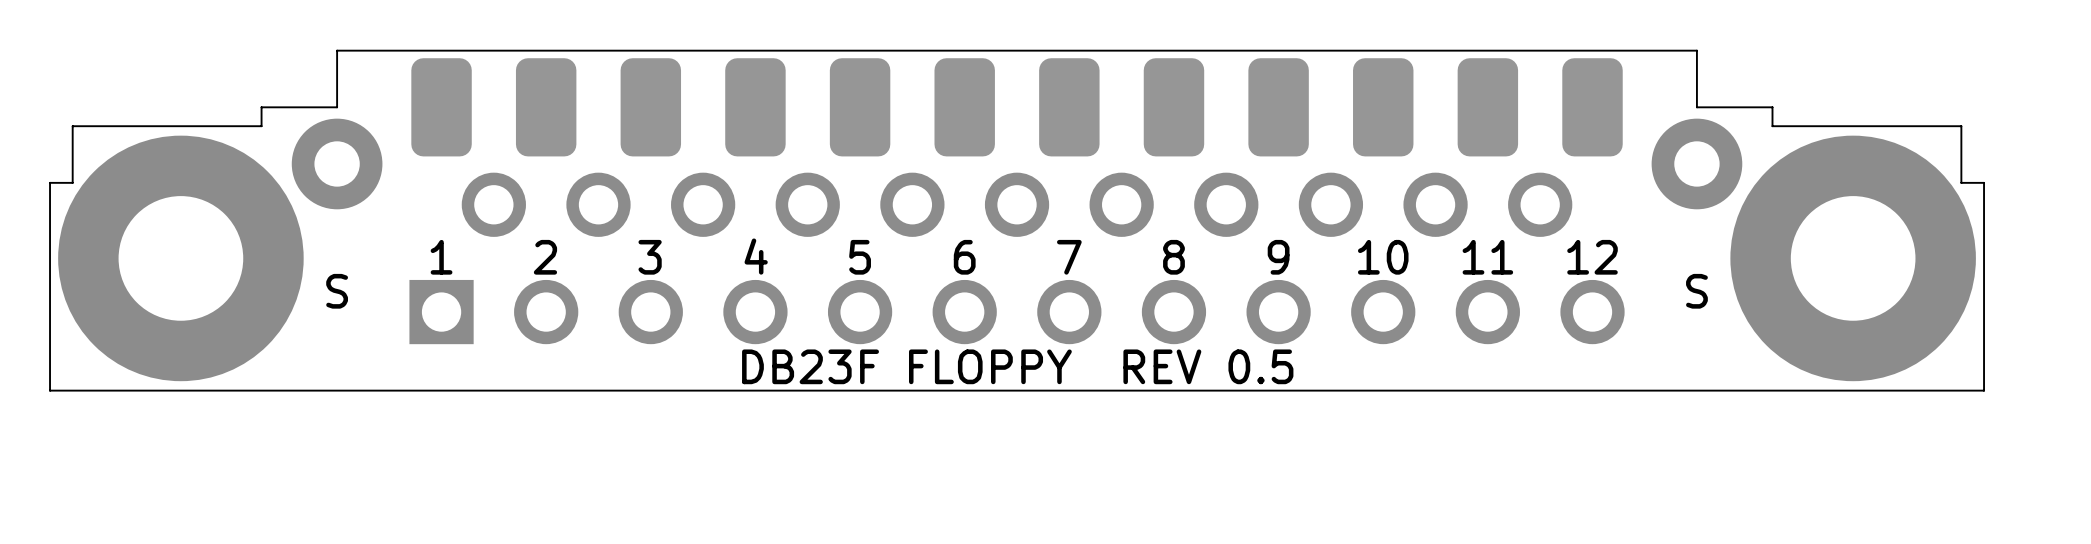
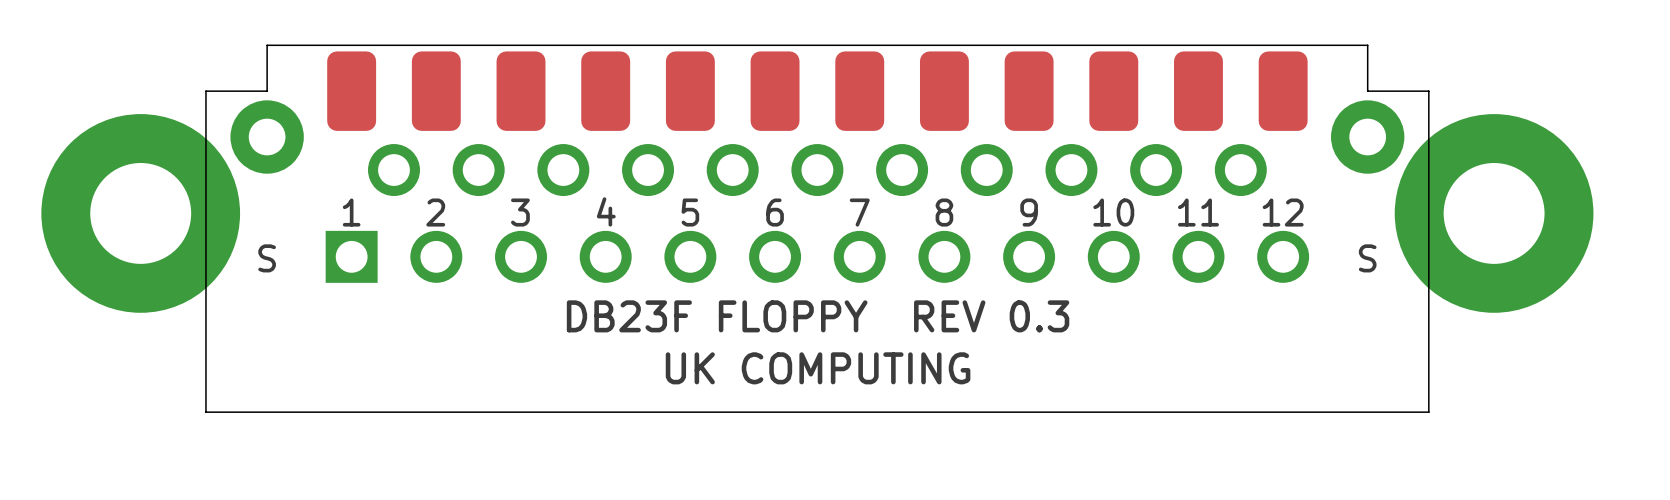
board edge: (261, 126) (72, 126) (72, 182) (50, 182) (50, 390) (1984, 390) (1984, 182) (1961, 182) (1961, 126) (1772, 126) -> (205, 106) (205, 412) (1428, 412) (1428, 106)
text position: S (337, 291) -> S (267, 258)
text position: S (1696, 291) -> S (1367, 258)
text: DB23F FLOPPY REV 0.5 (1017, 366) -> DB23F FLOPPY REV 0.3 (818, 316)
text: none -> UK COMPUTING (818, 368)

